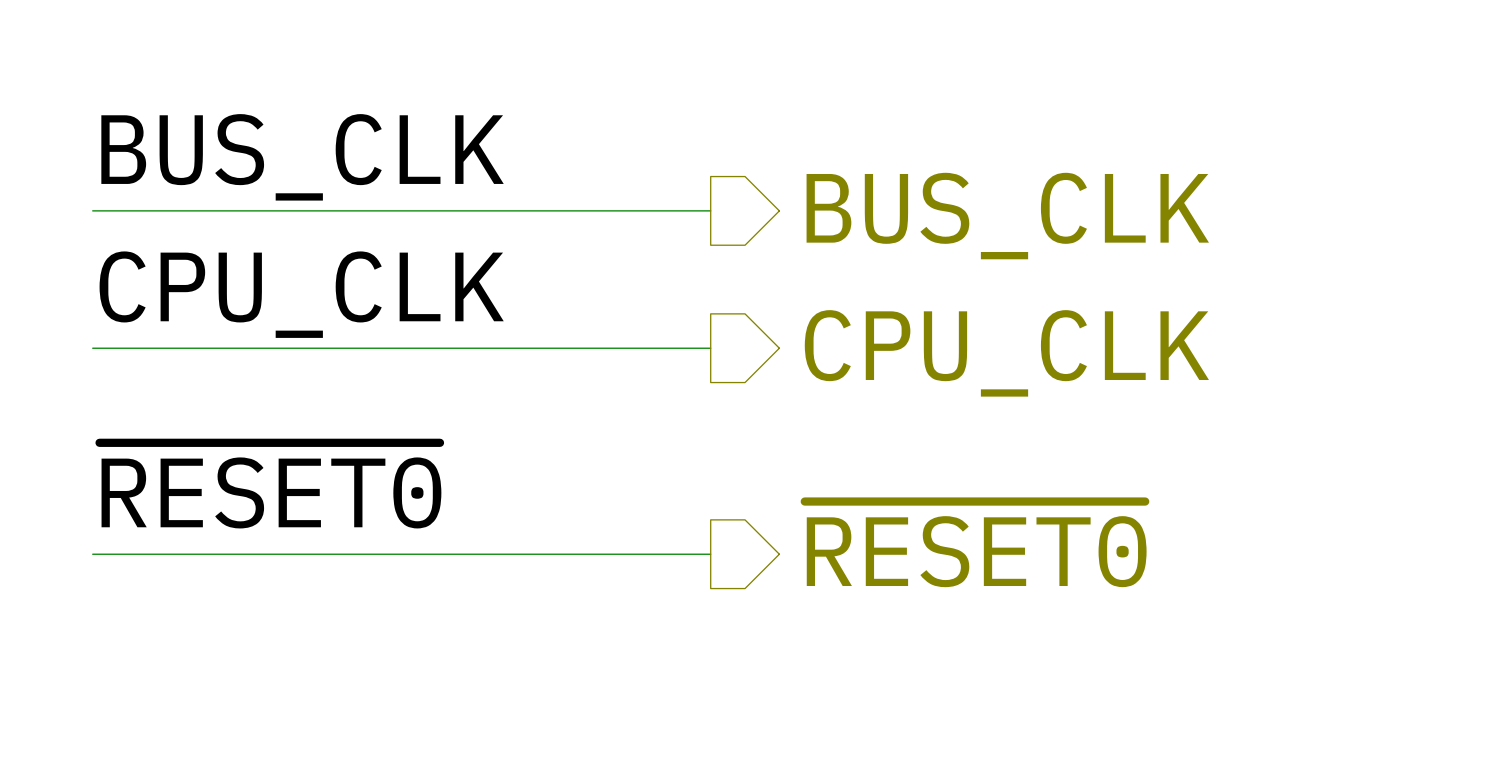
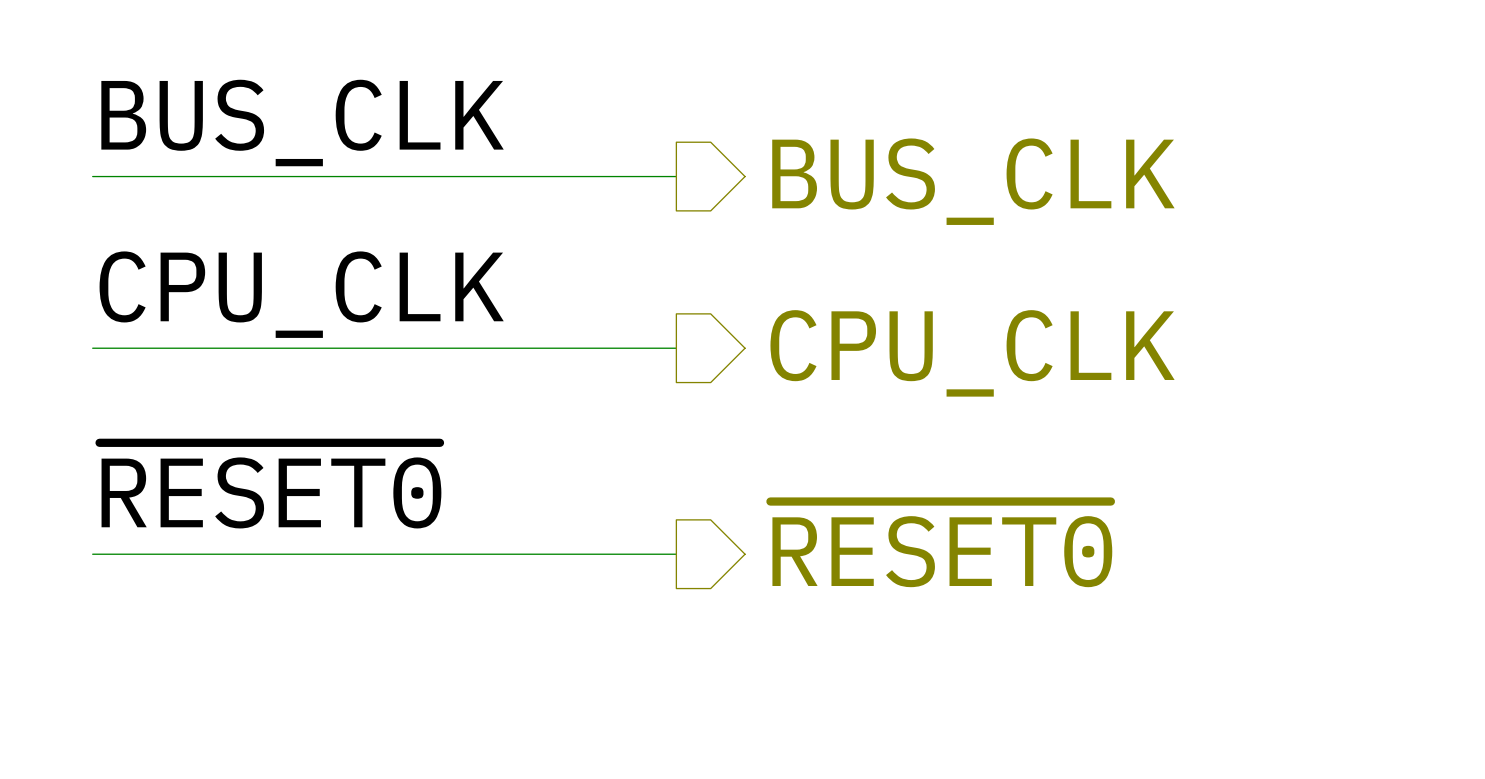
label position: BUS_CLK (302, 157) -> BUS_CLK (302, 123)
wire: none -> (92, 176) (676, 176)
wire: (92, 210) (710, 210) -> none
hierarchical label position: BUS_CLK (1007, 216) -> BUS_CLK (973, 181)
wire: (676, 348) (710, 348) -> none
hierarchical label position: CPU_CLK (1006, 353) -> CPU_CLK (972, 353)
hierarchical label position: ~{RESET0} (975, 544) -> ~{RESET0} (941, 544)
wire: (676, 554) (710, 554) -> none

